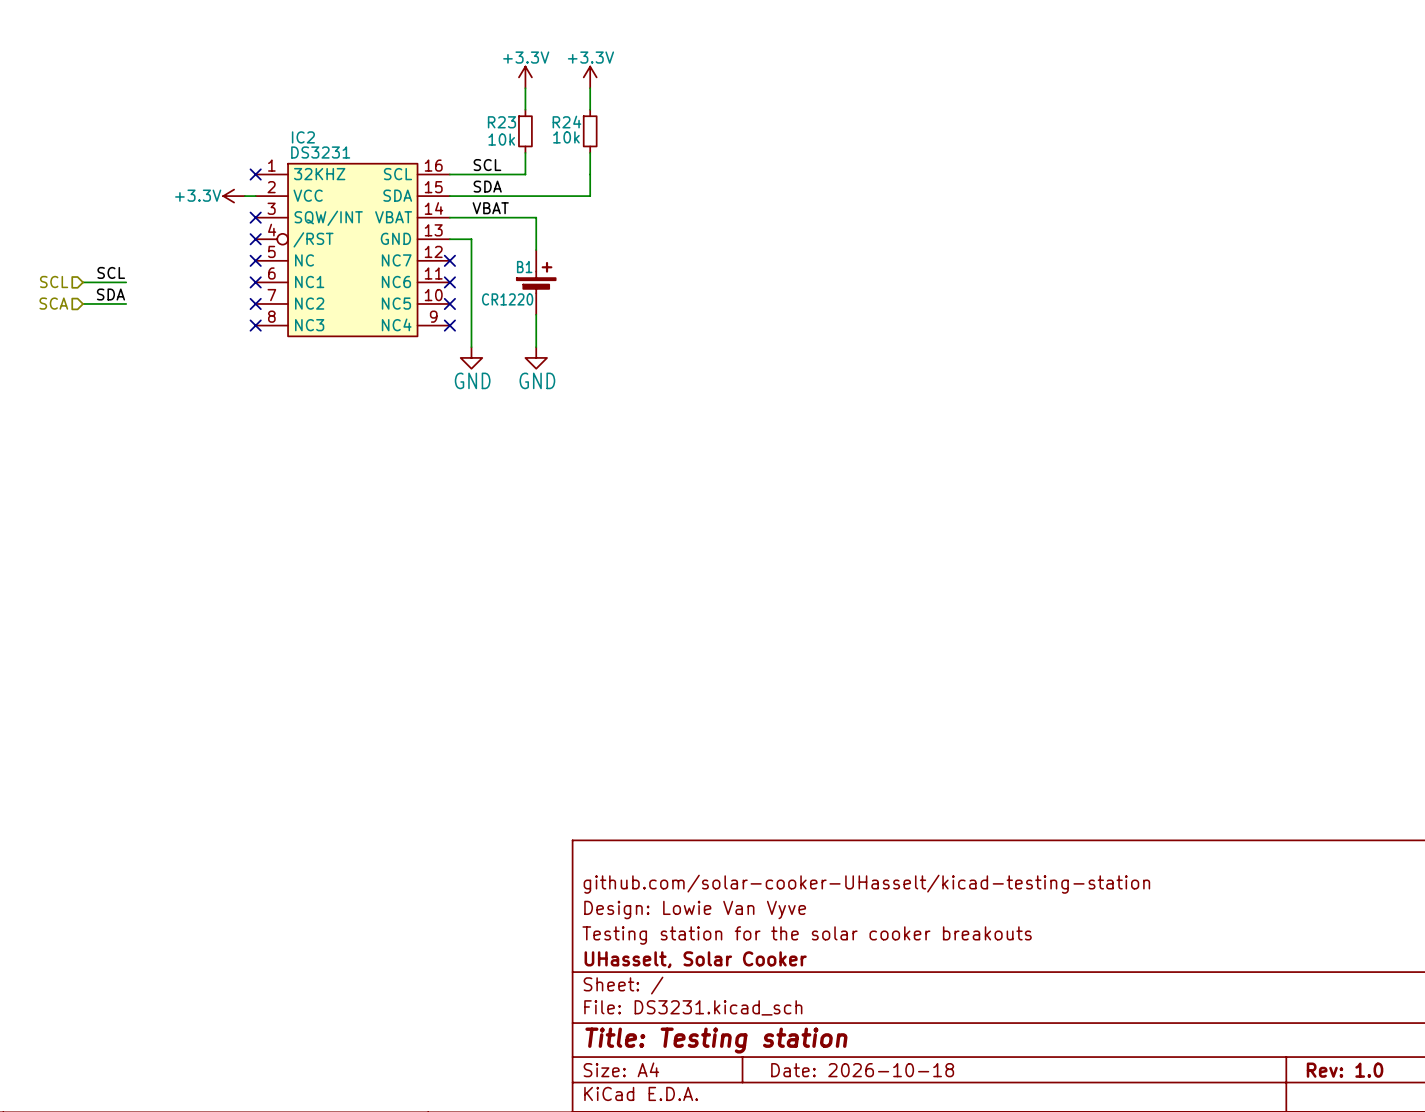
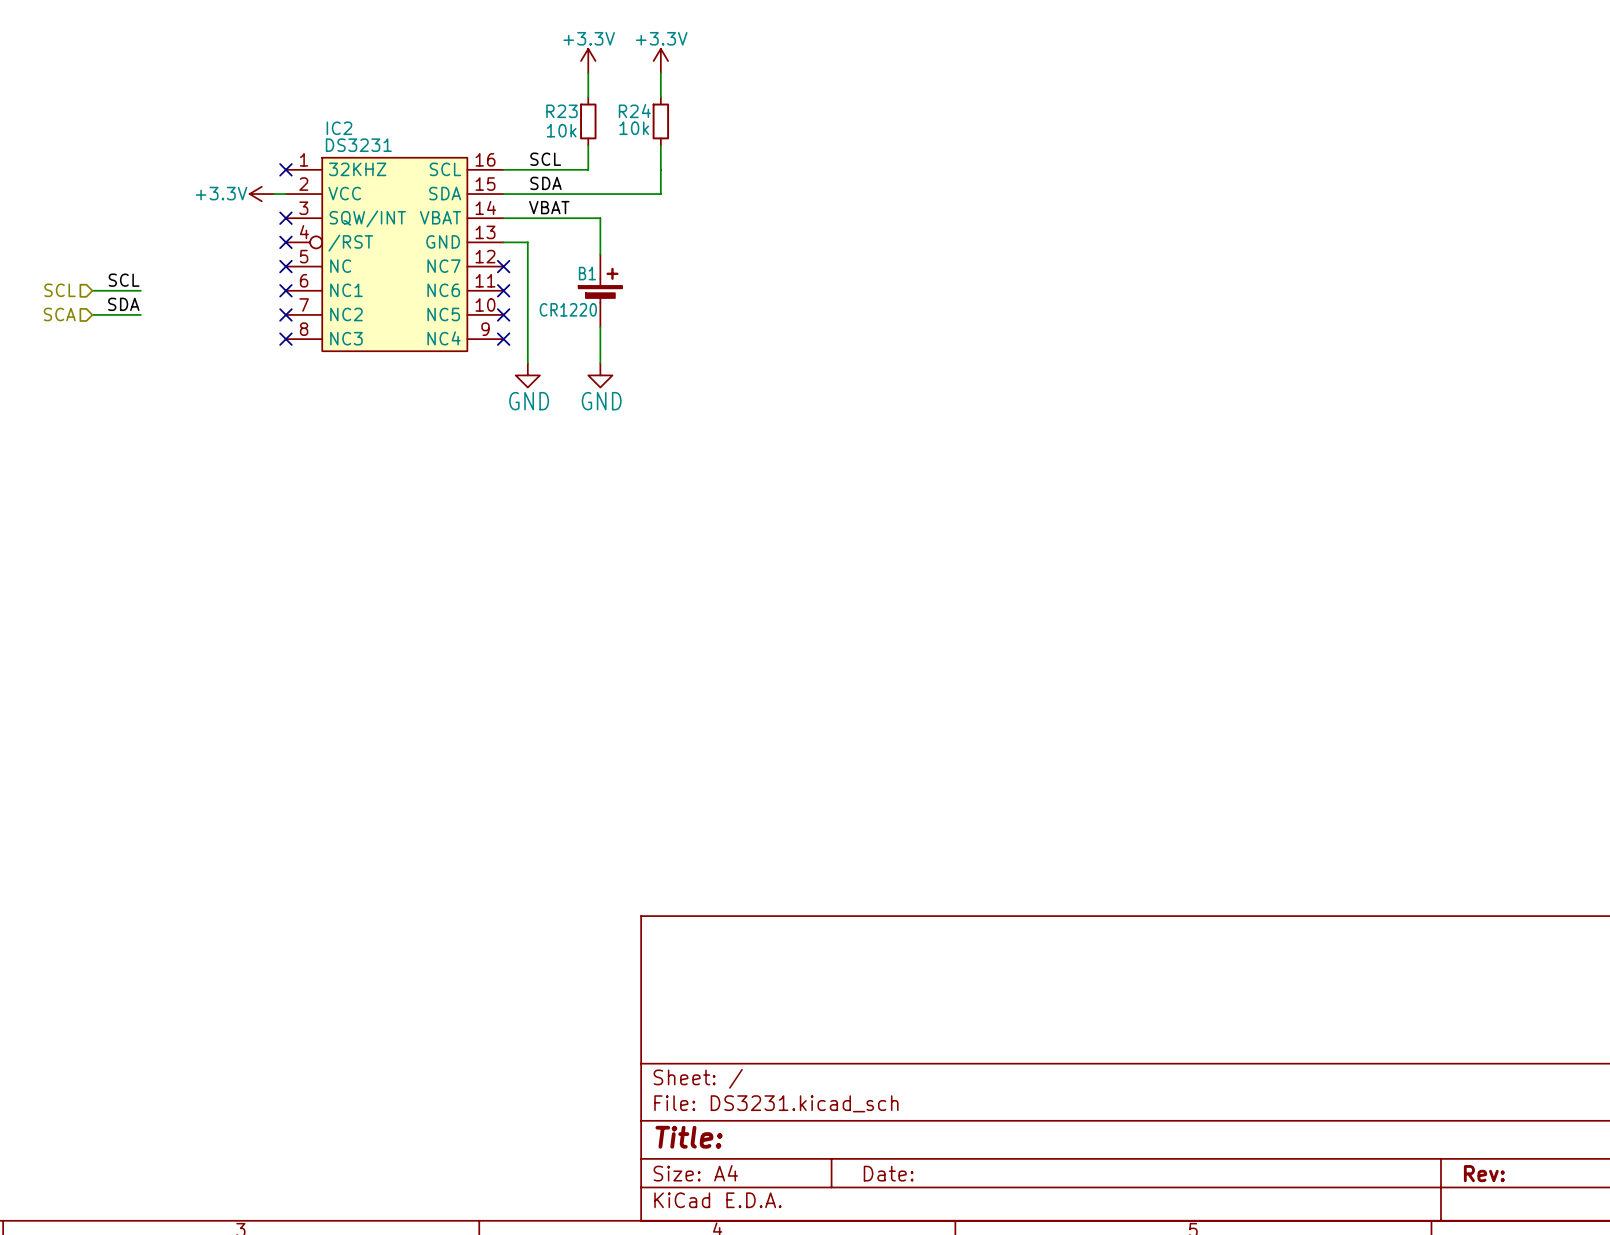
title block: github.com/solar-cooker-UHasselt/kicad-testing-station (866, 884) -> none
title block: Design: Lowie Van Vyve (695, 910) -> none
title block: Testing station for the solar cooker breakouts (807, 935) -> none
title block: UHasselt, Solar Cooker (695, 959) -> none
title block: Title: Testing station (716, 1040) -> Title: (689, 1137)
title block: Date: 2026-10-18 (862, 1070) -> Date: (888, 1173)
title block: Rev: 1.0 (1345, 1070) -> Rev: (1484, 1173)

